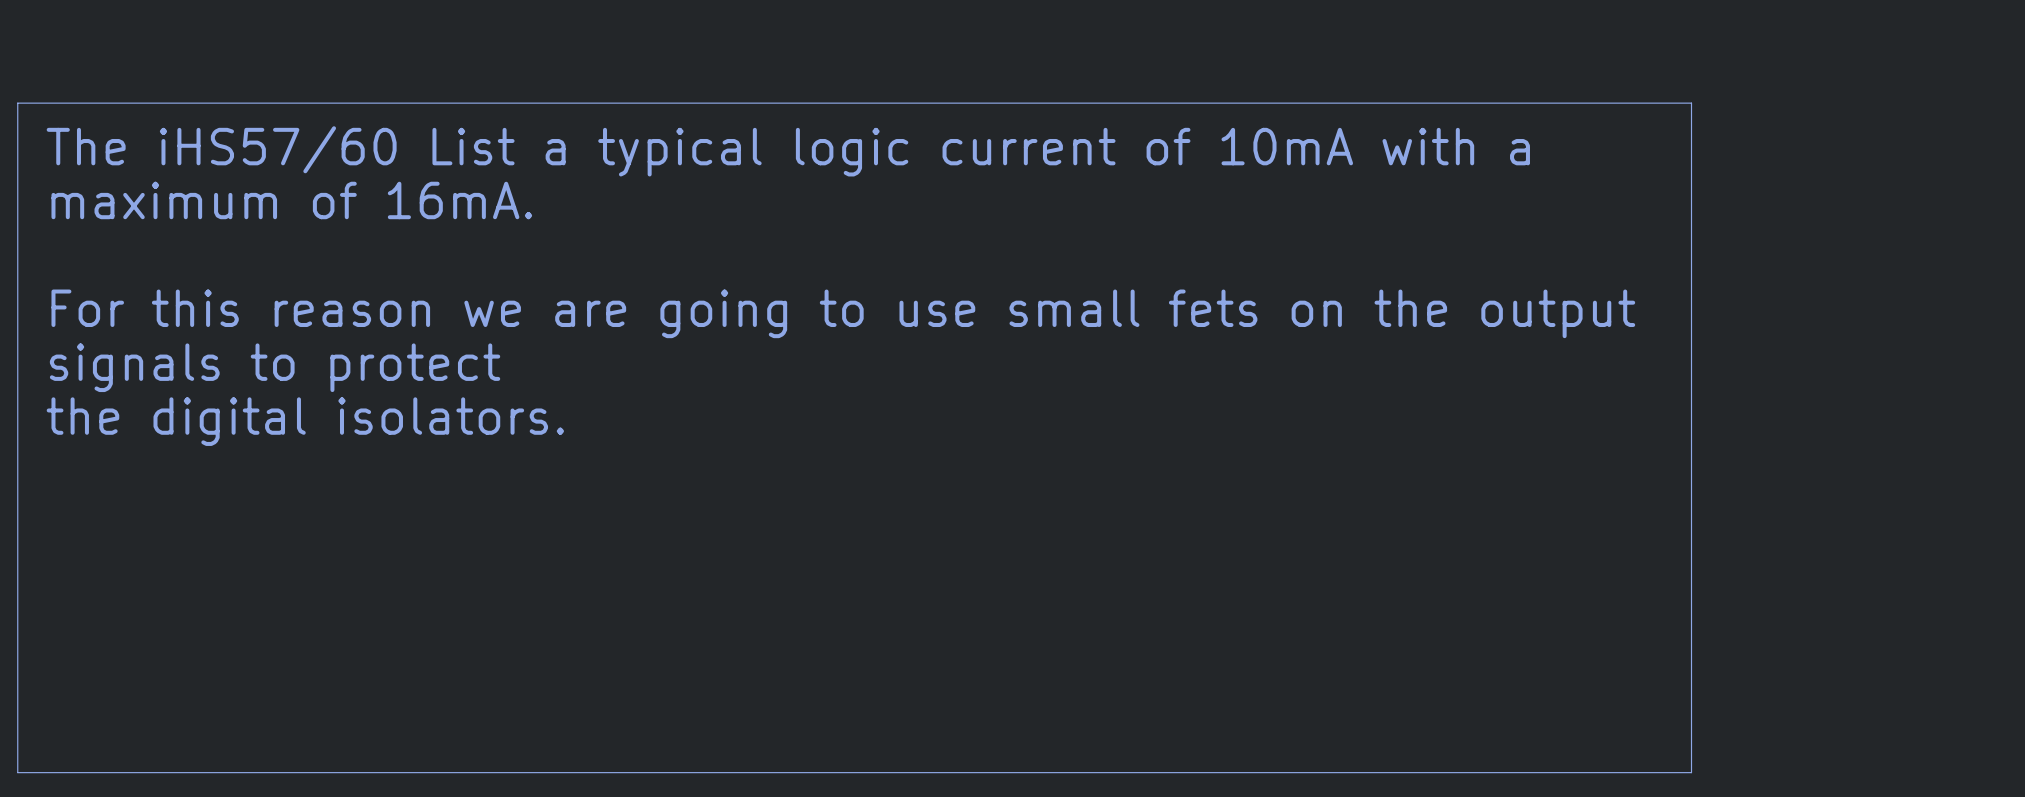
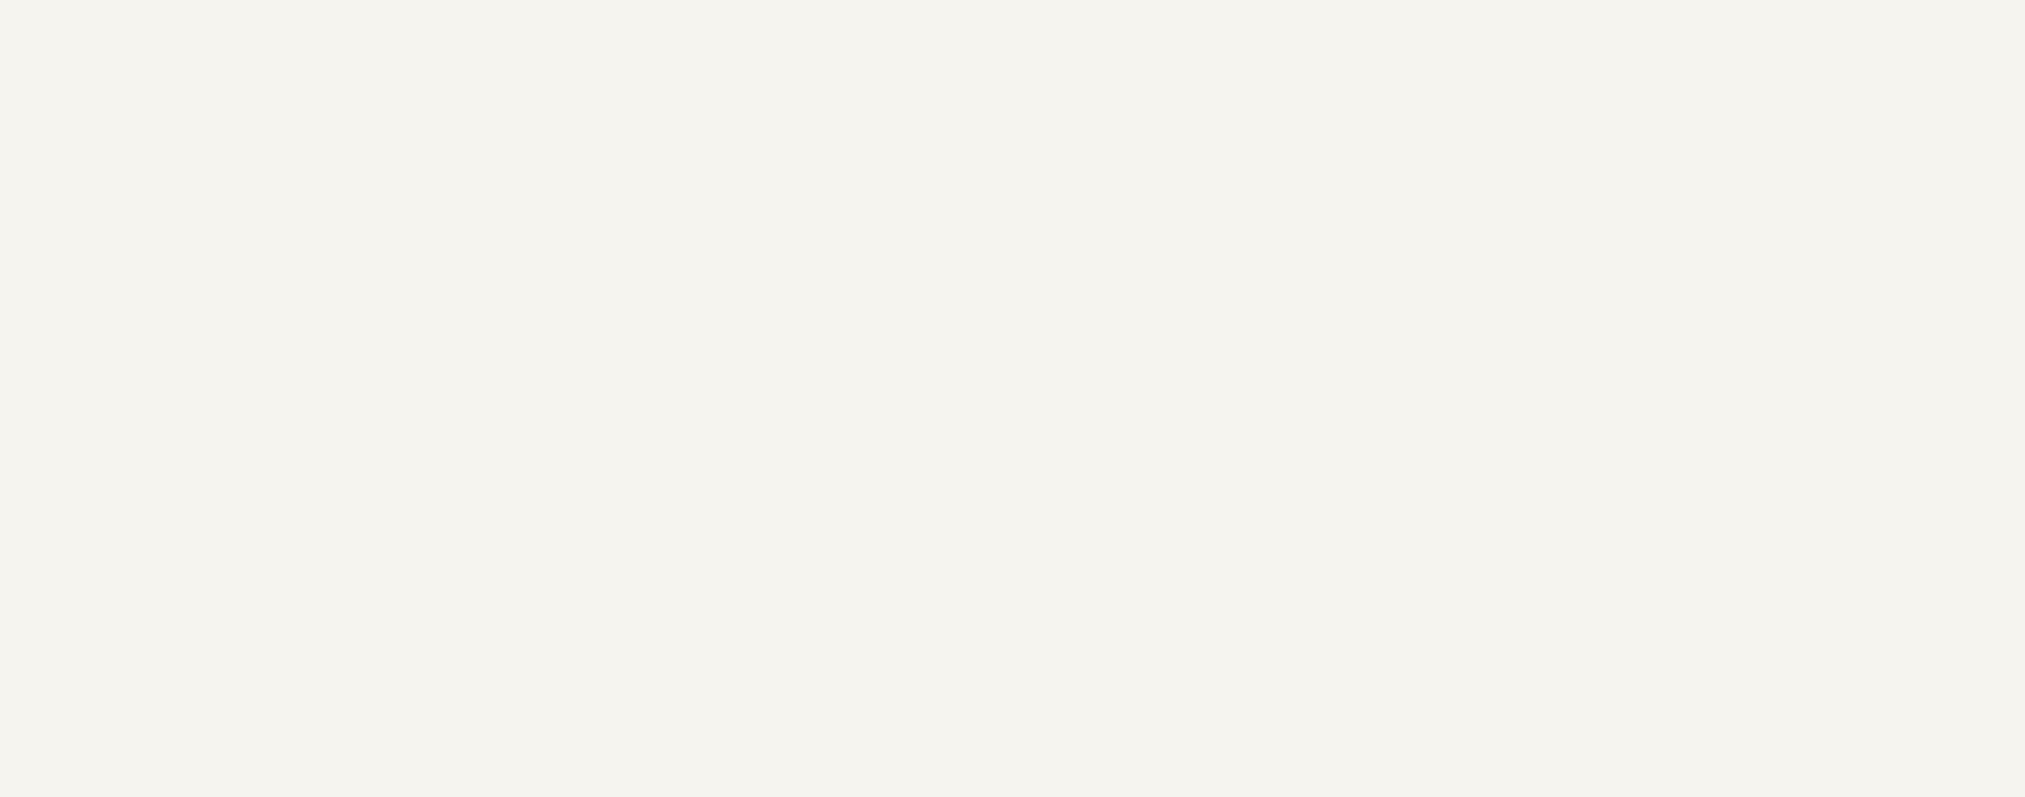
line: (17, 103) (1691, 103) (1691, 772) (17, 772) (17, 103) -> none
text: The iHS57/60 List a typical logic current of 10mA with a (788, 151) -> none
text: maximum of 16mA. (291, 200) -> none
text: For this reason we are going to use small fets on the output (843, 313) -> none
text: signals to protect (275, 367) -> none
text: the digital isolators. (305, 421) -> none

